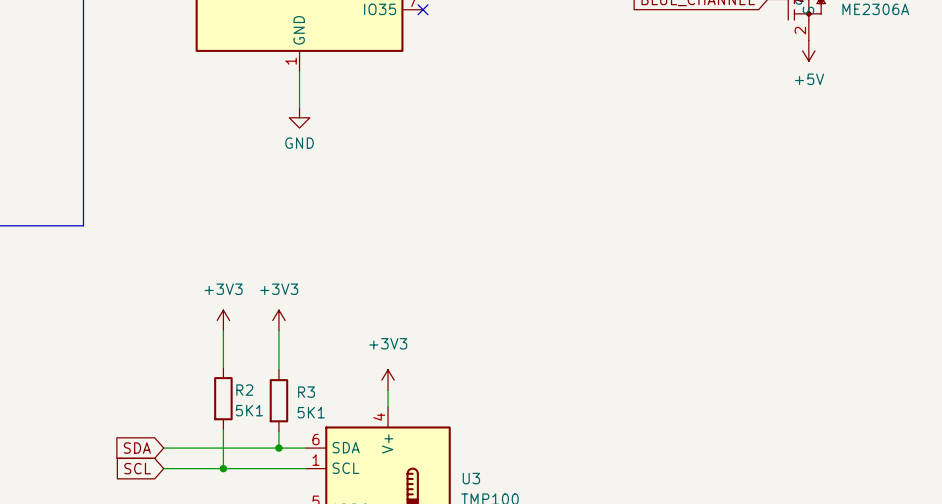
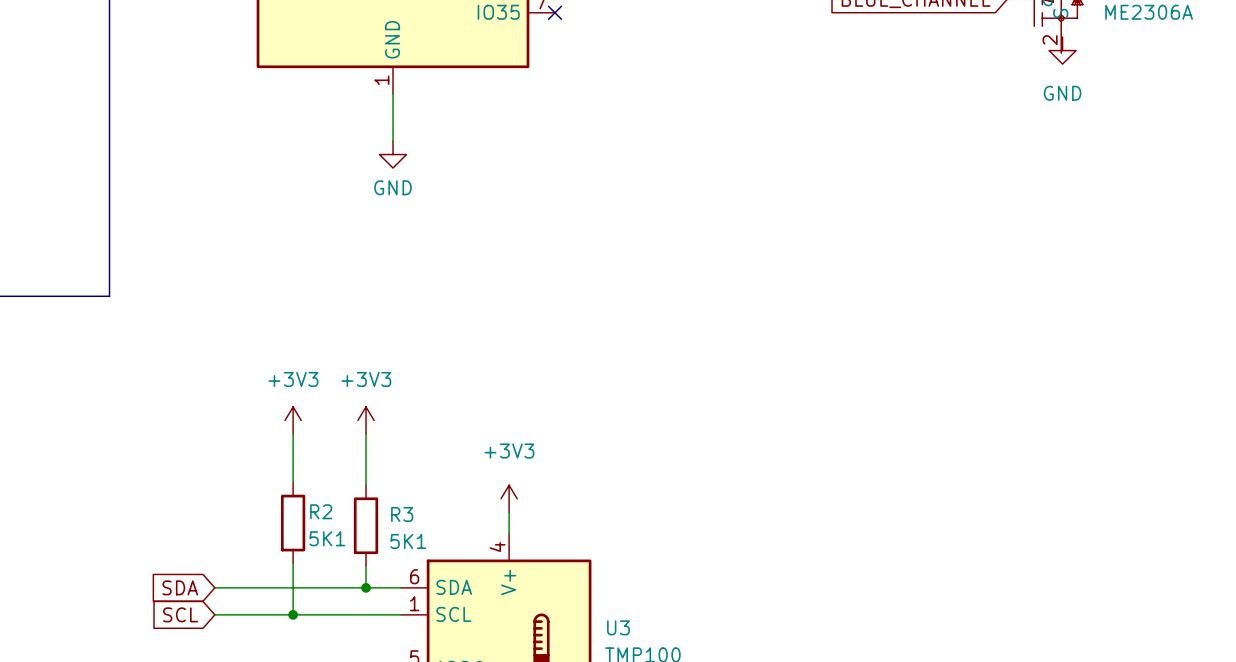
power symbol: none -> GND (1062, 50)
power symbol: +5V (808, 50) -> none

